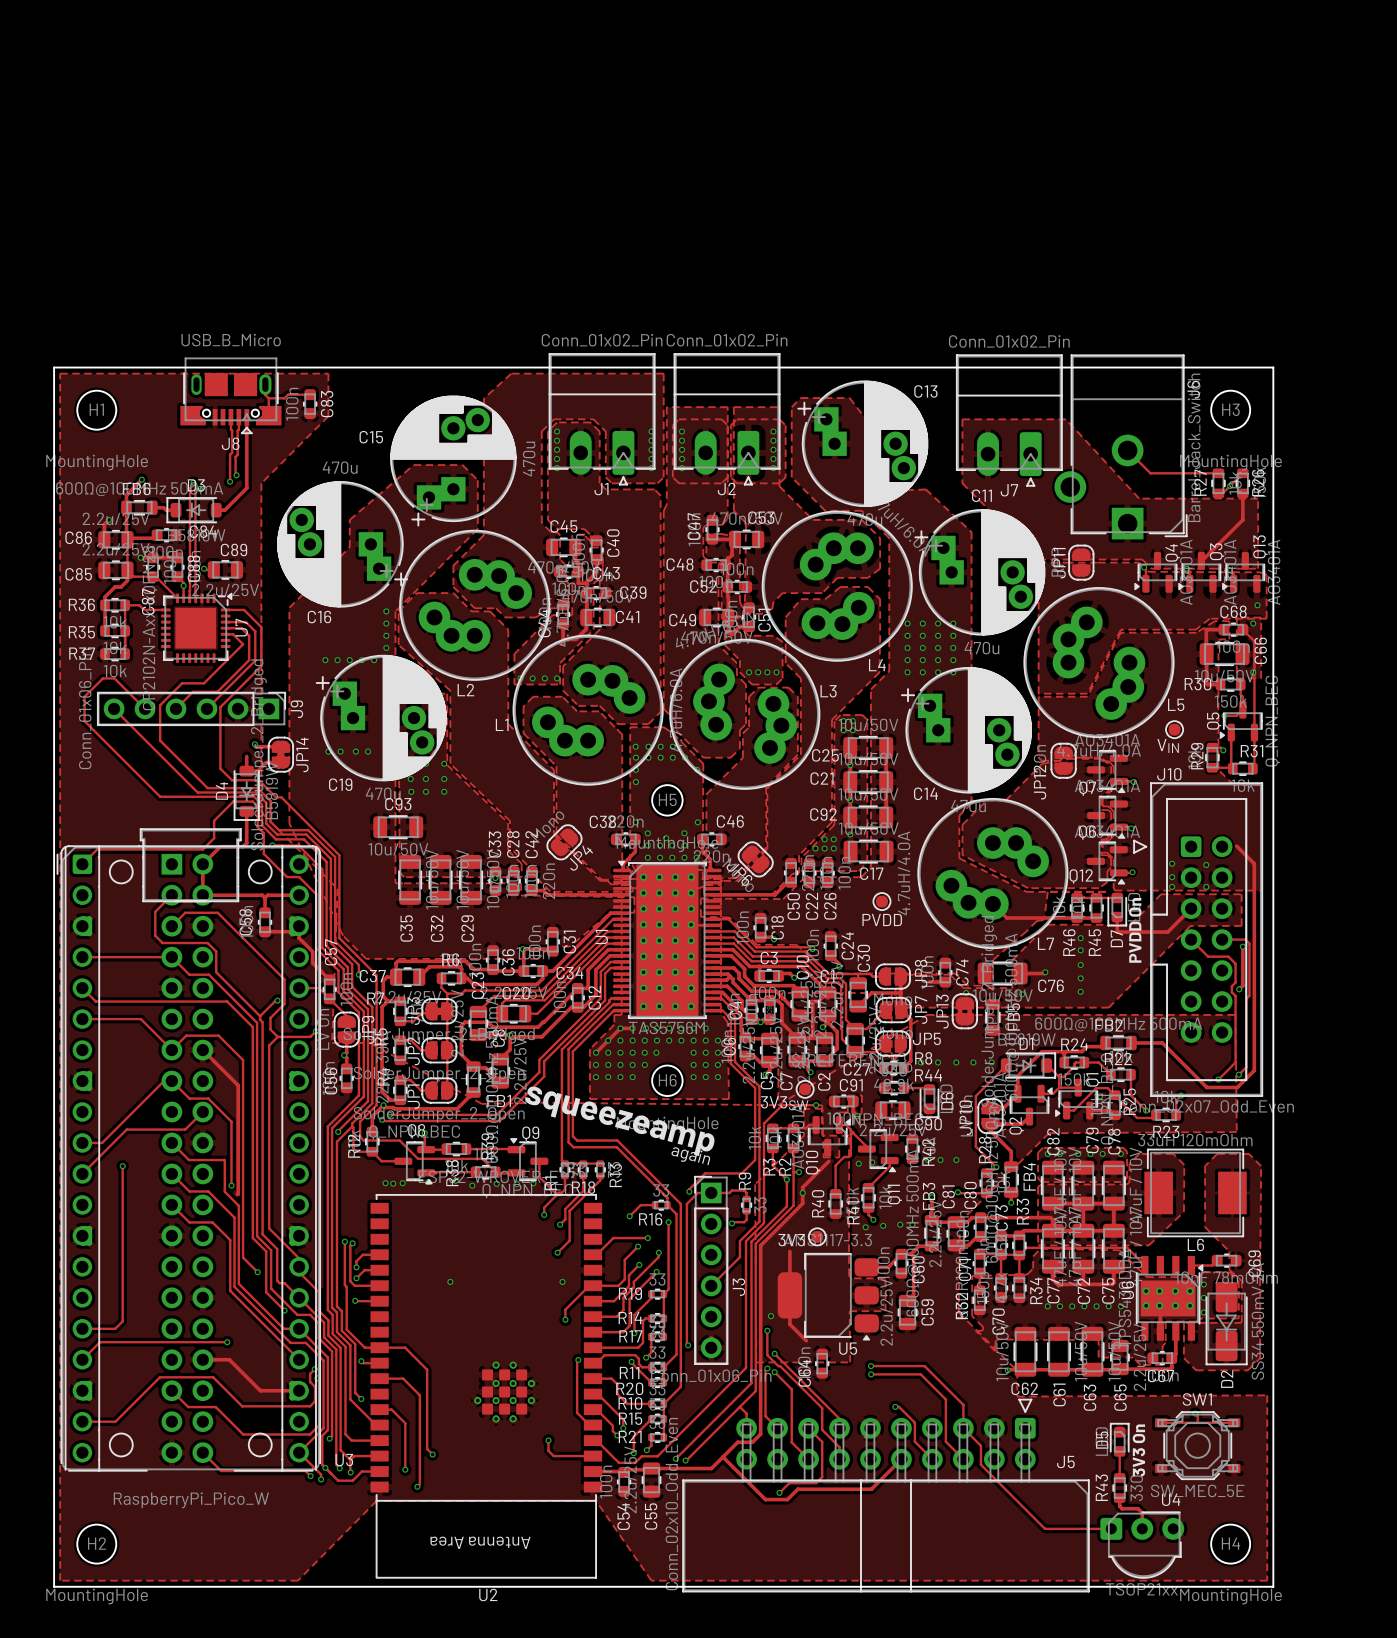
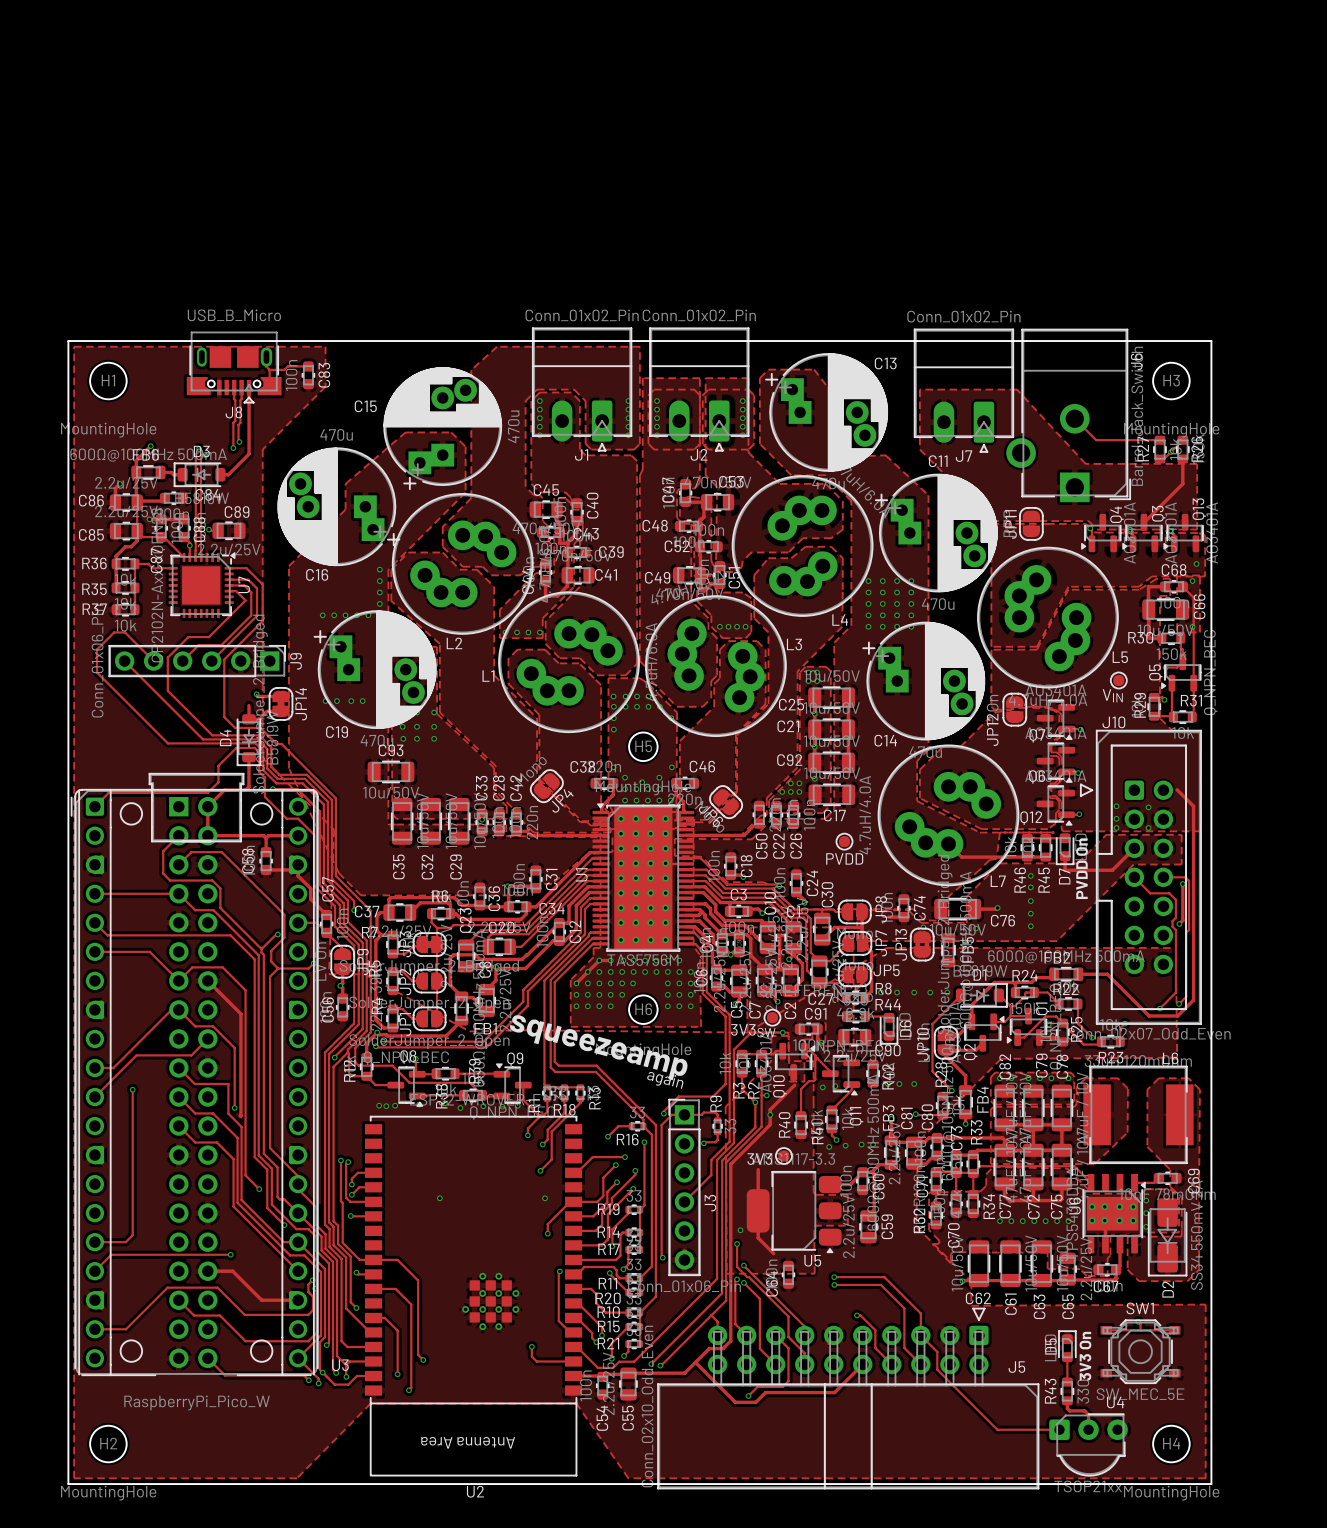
L6 footprint: [1144, 1148, 1247, 1238] -> [1083, 1065, 1194, 1164]
L6 name position: L6 (1195, 1244) -> L6 (1170, 1058)

